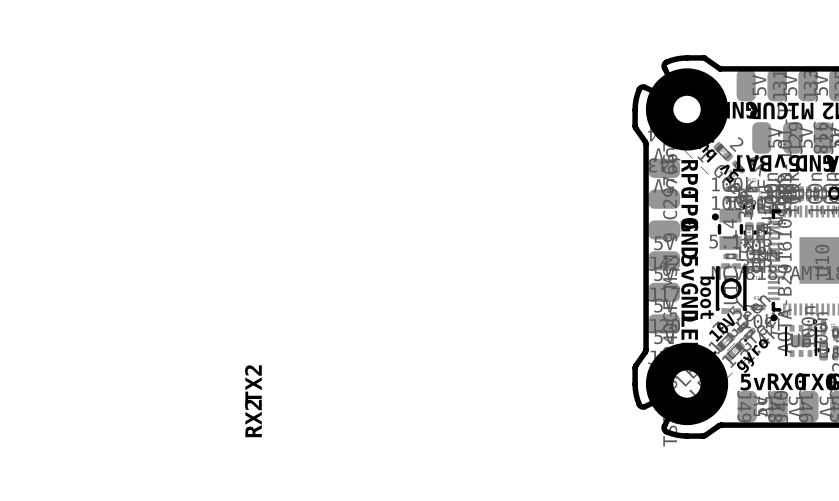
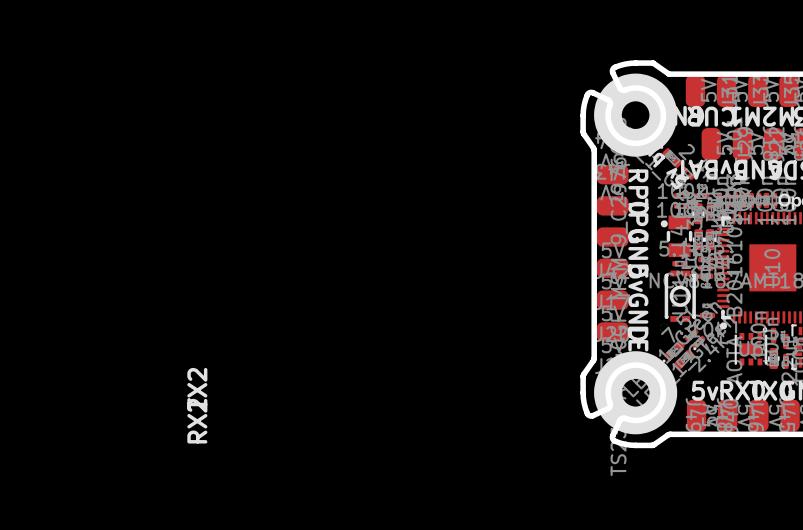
text: boot (707, 297) -> none
text: 10V (722, 327) -> none
text: gyro (752, 356) -> none

